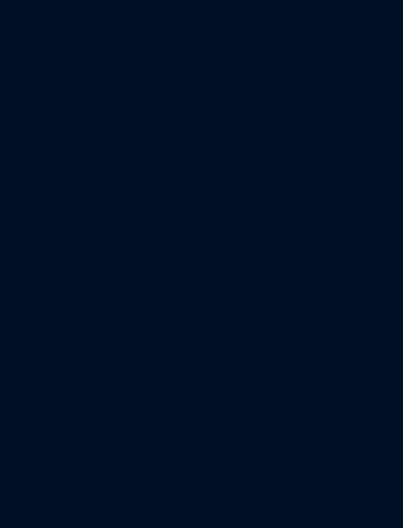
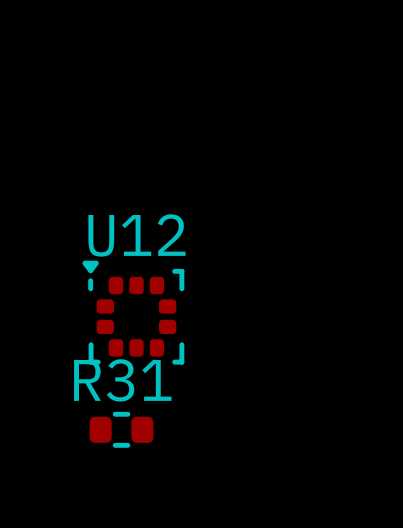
U12: none -> (133, 312)
R31: none -> (121, 429)

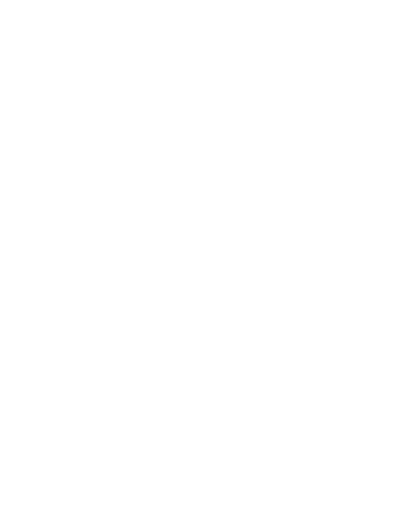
U12: (133, 312) -> none
R31: (121, 429) -> none

